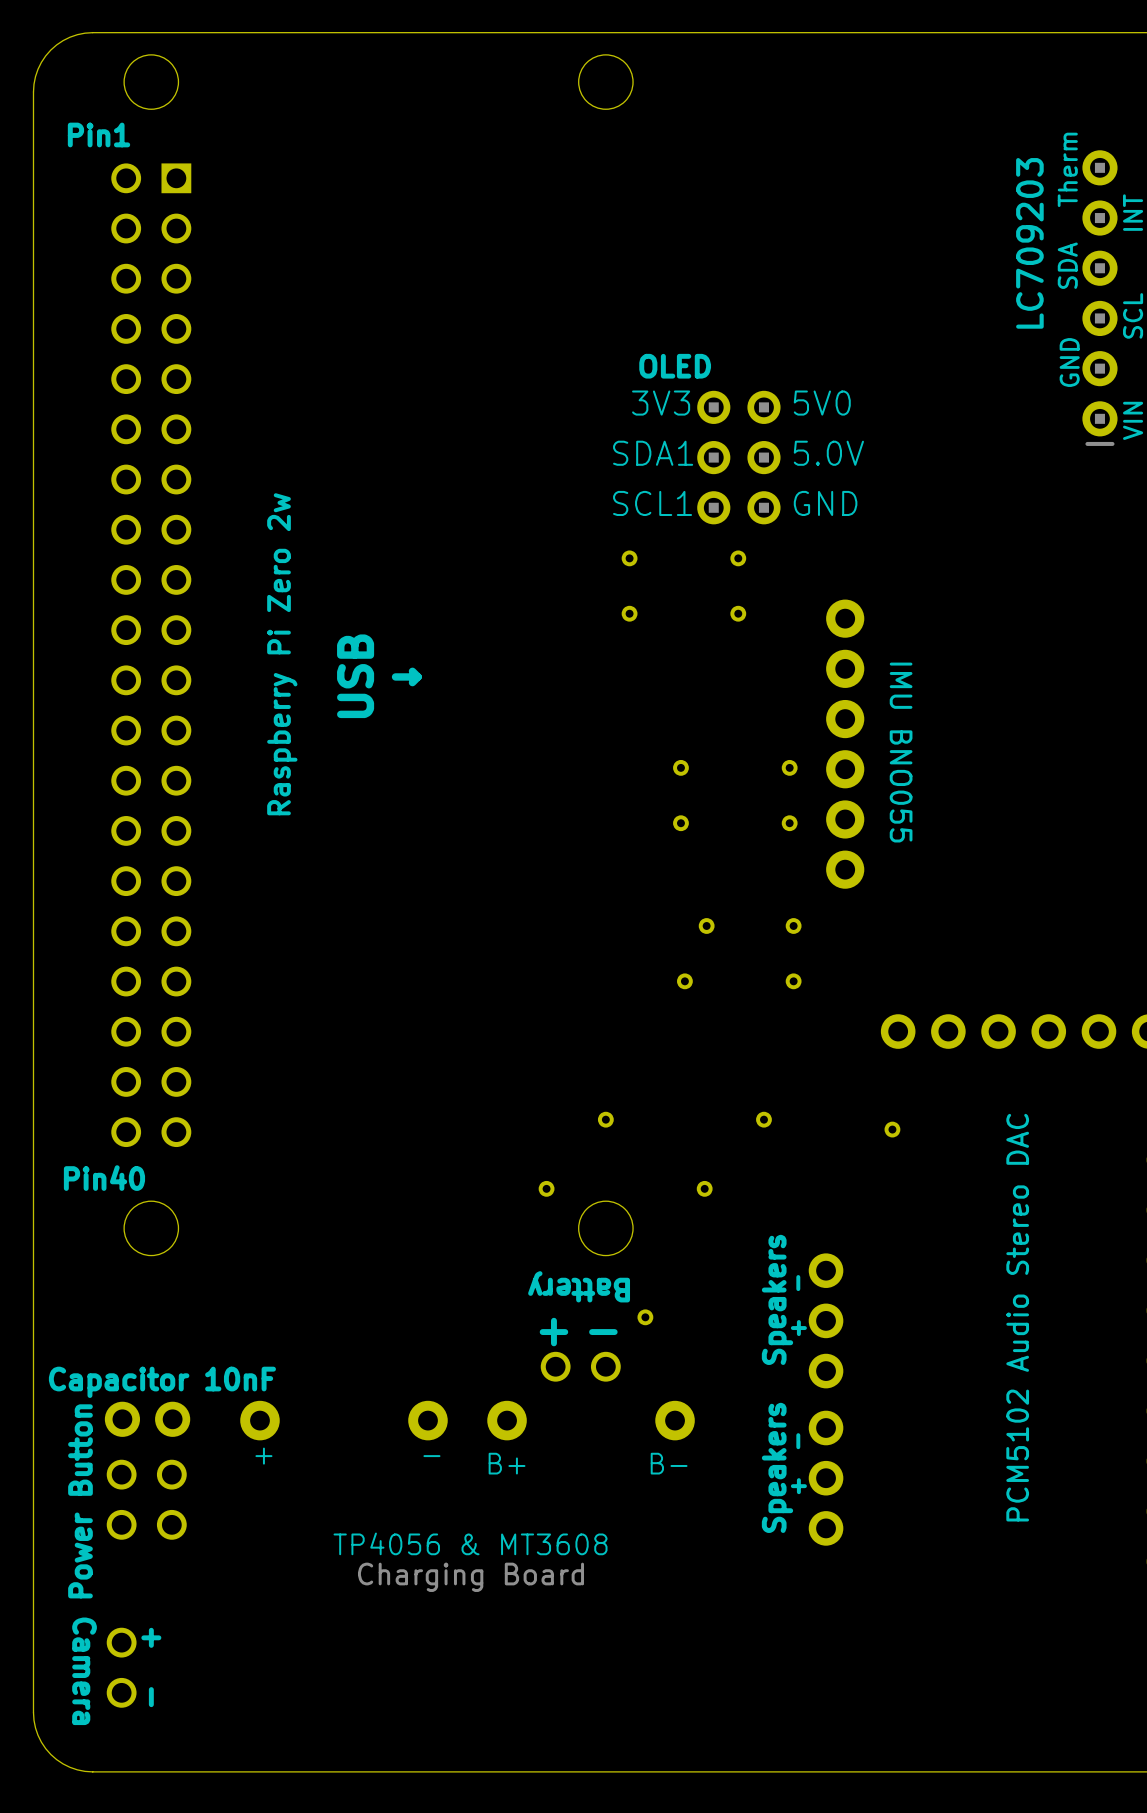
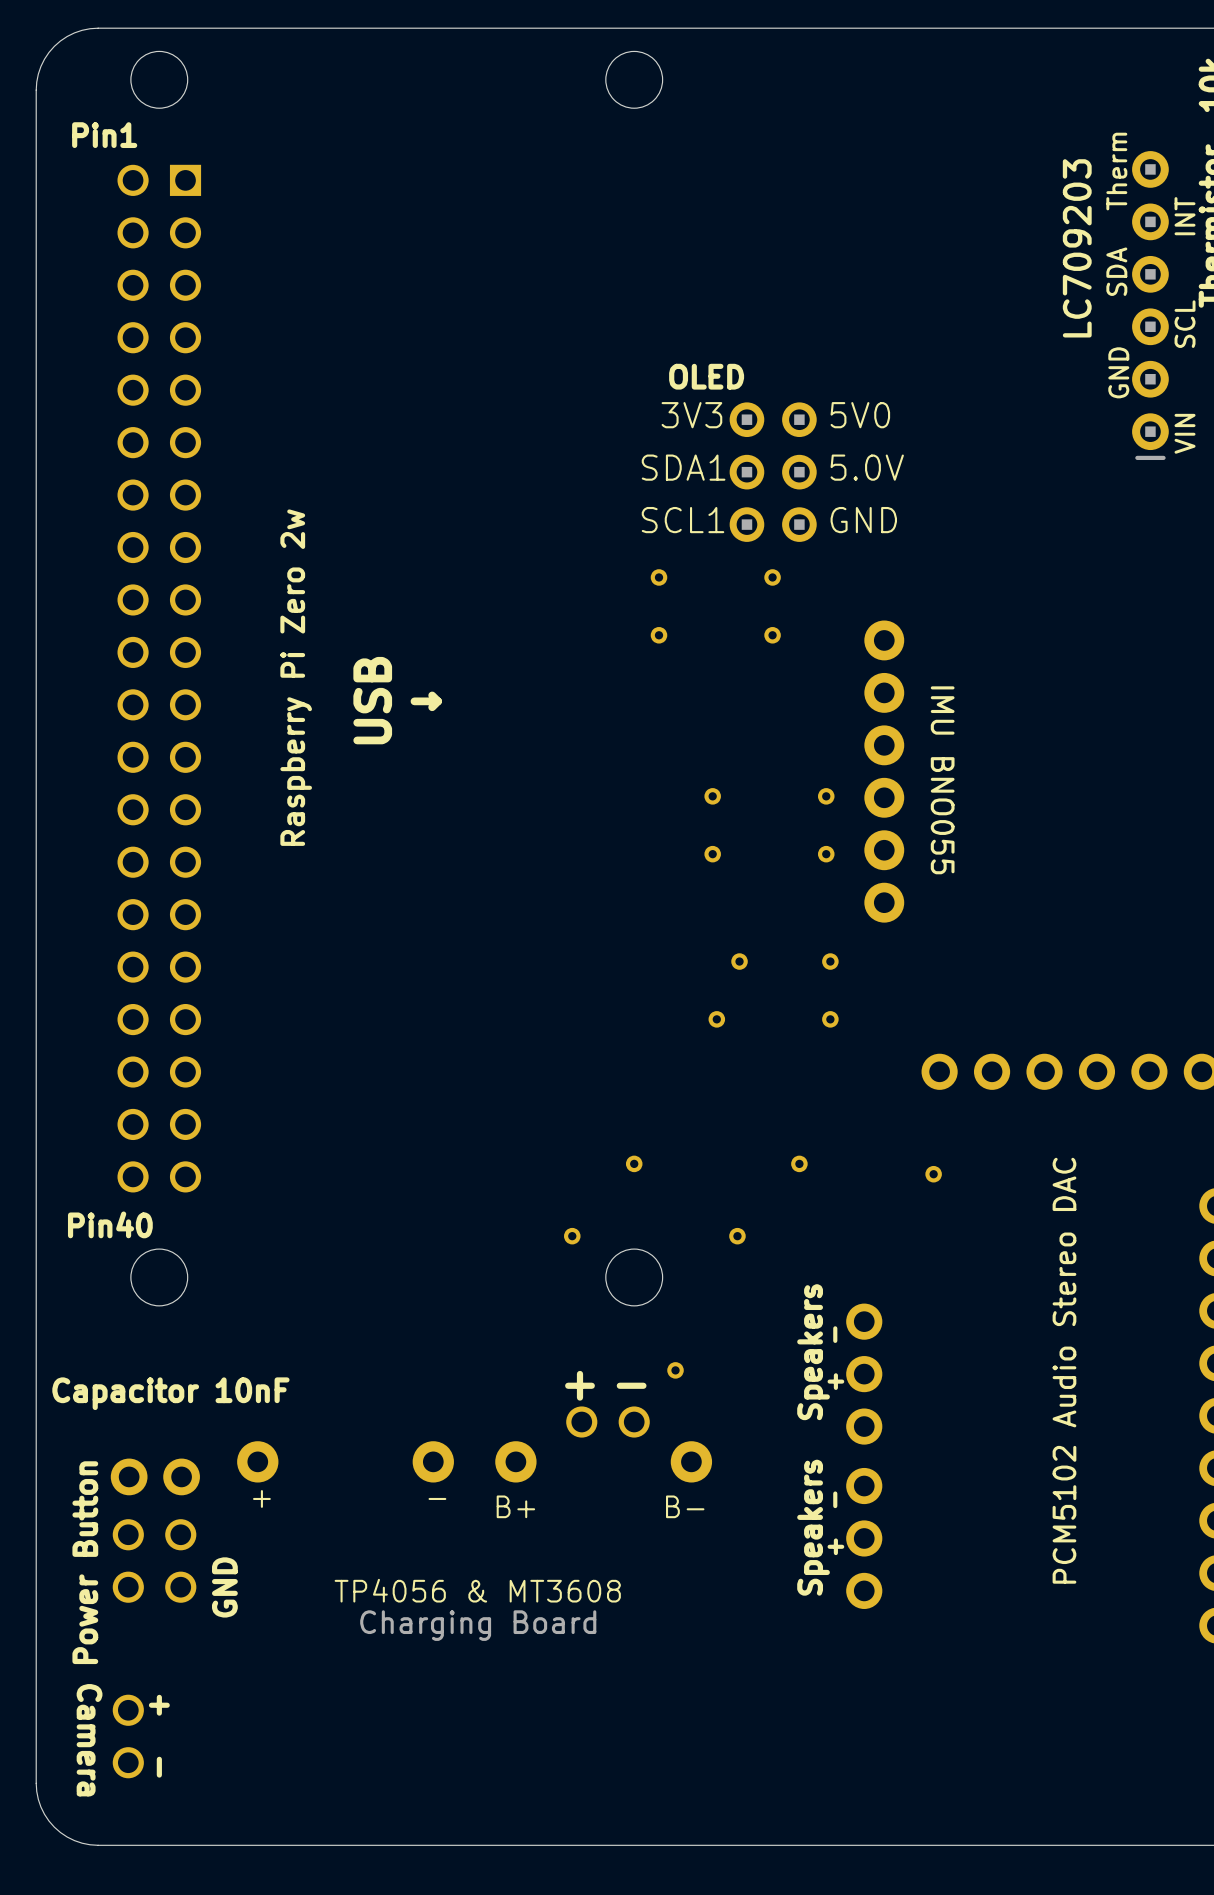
text: Battery (579, 1286) -> none
text position: Capacitor 10nF (162, 1382) -> Capacitor 10nF (170, 1393)
TP4056 & MT3608 position: (467, 1420) -> (474, 1461)
text: none -> GND (224, 1587)

